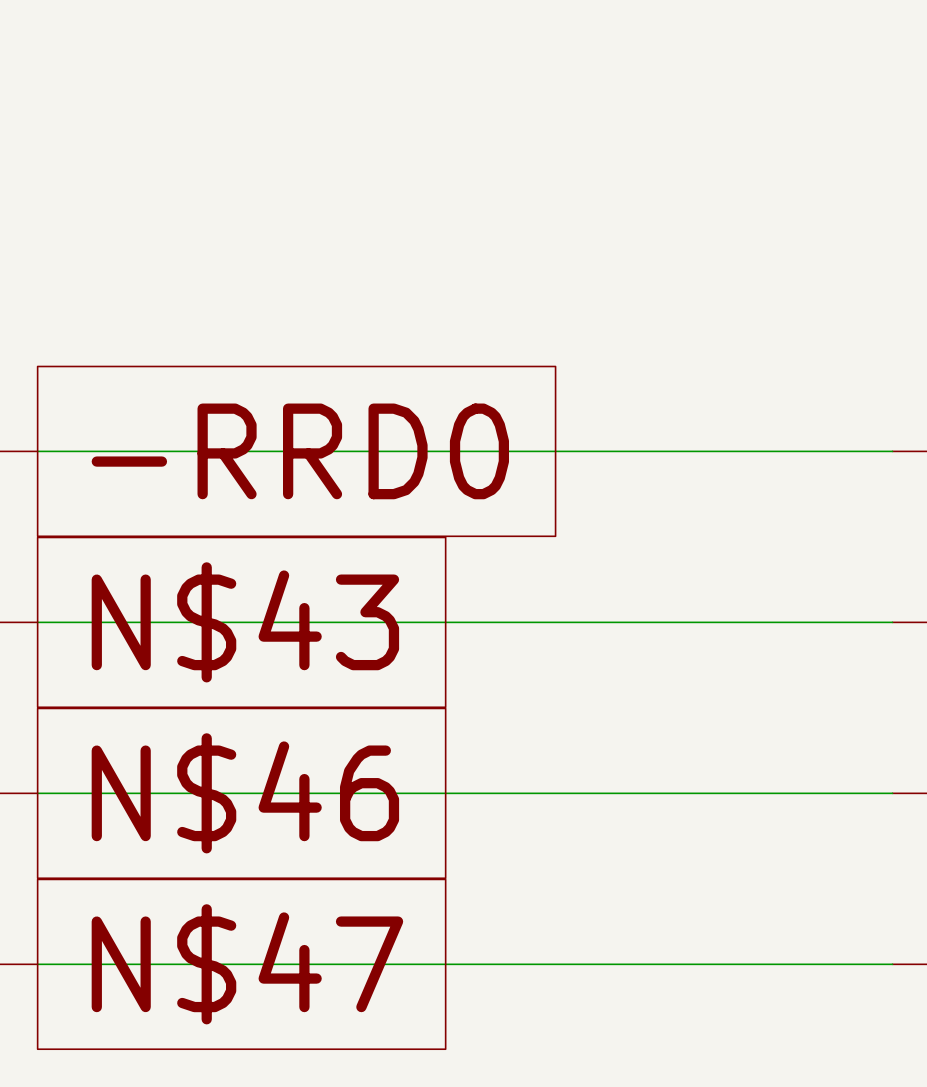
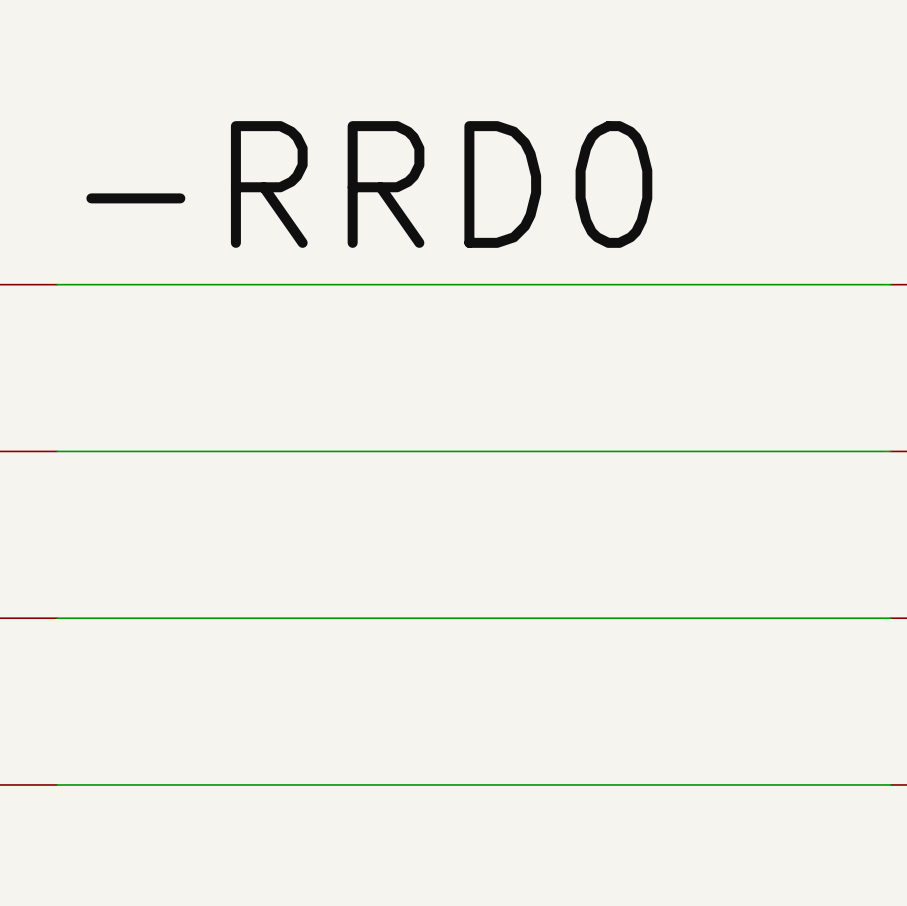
label: none -> -RRD0 (369, 184)
global label: -RRD0 (300, 451) -> none
global label: N$43 (245, 622) -> none
global label: N$46 (245, 793) -> none
global label: N$47 (247, 964) -> none

